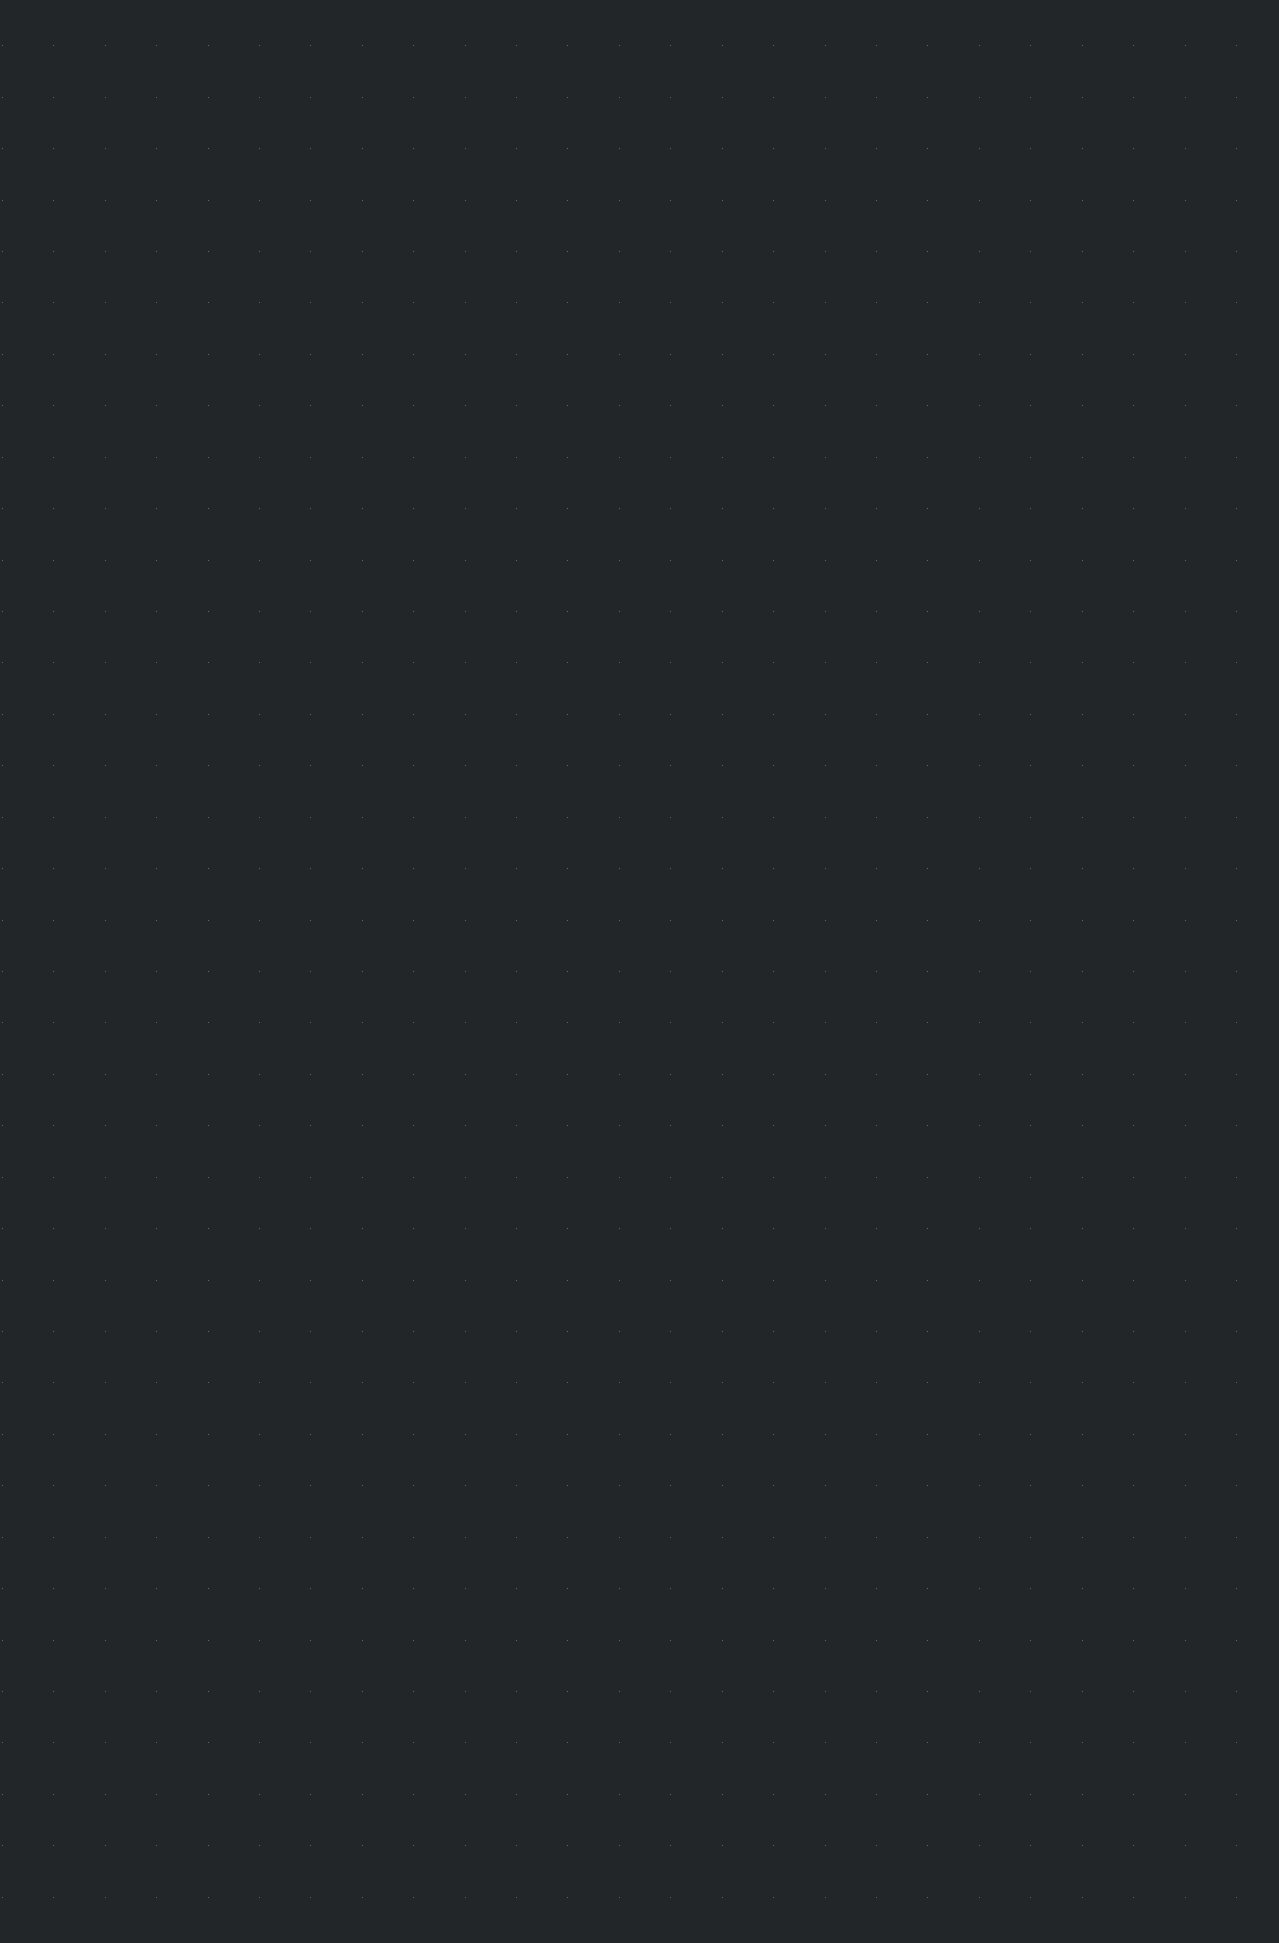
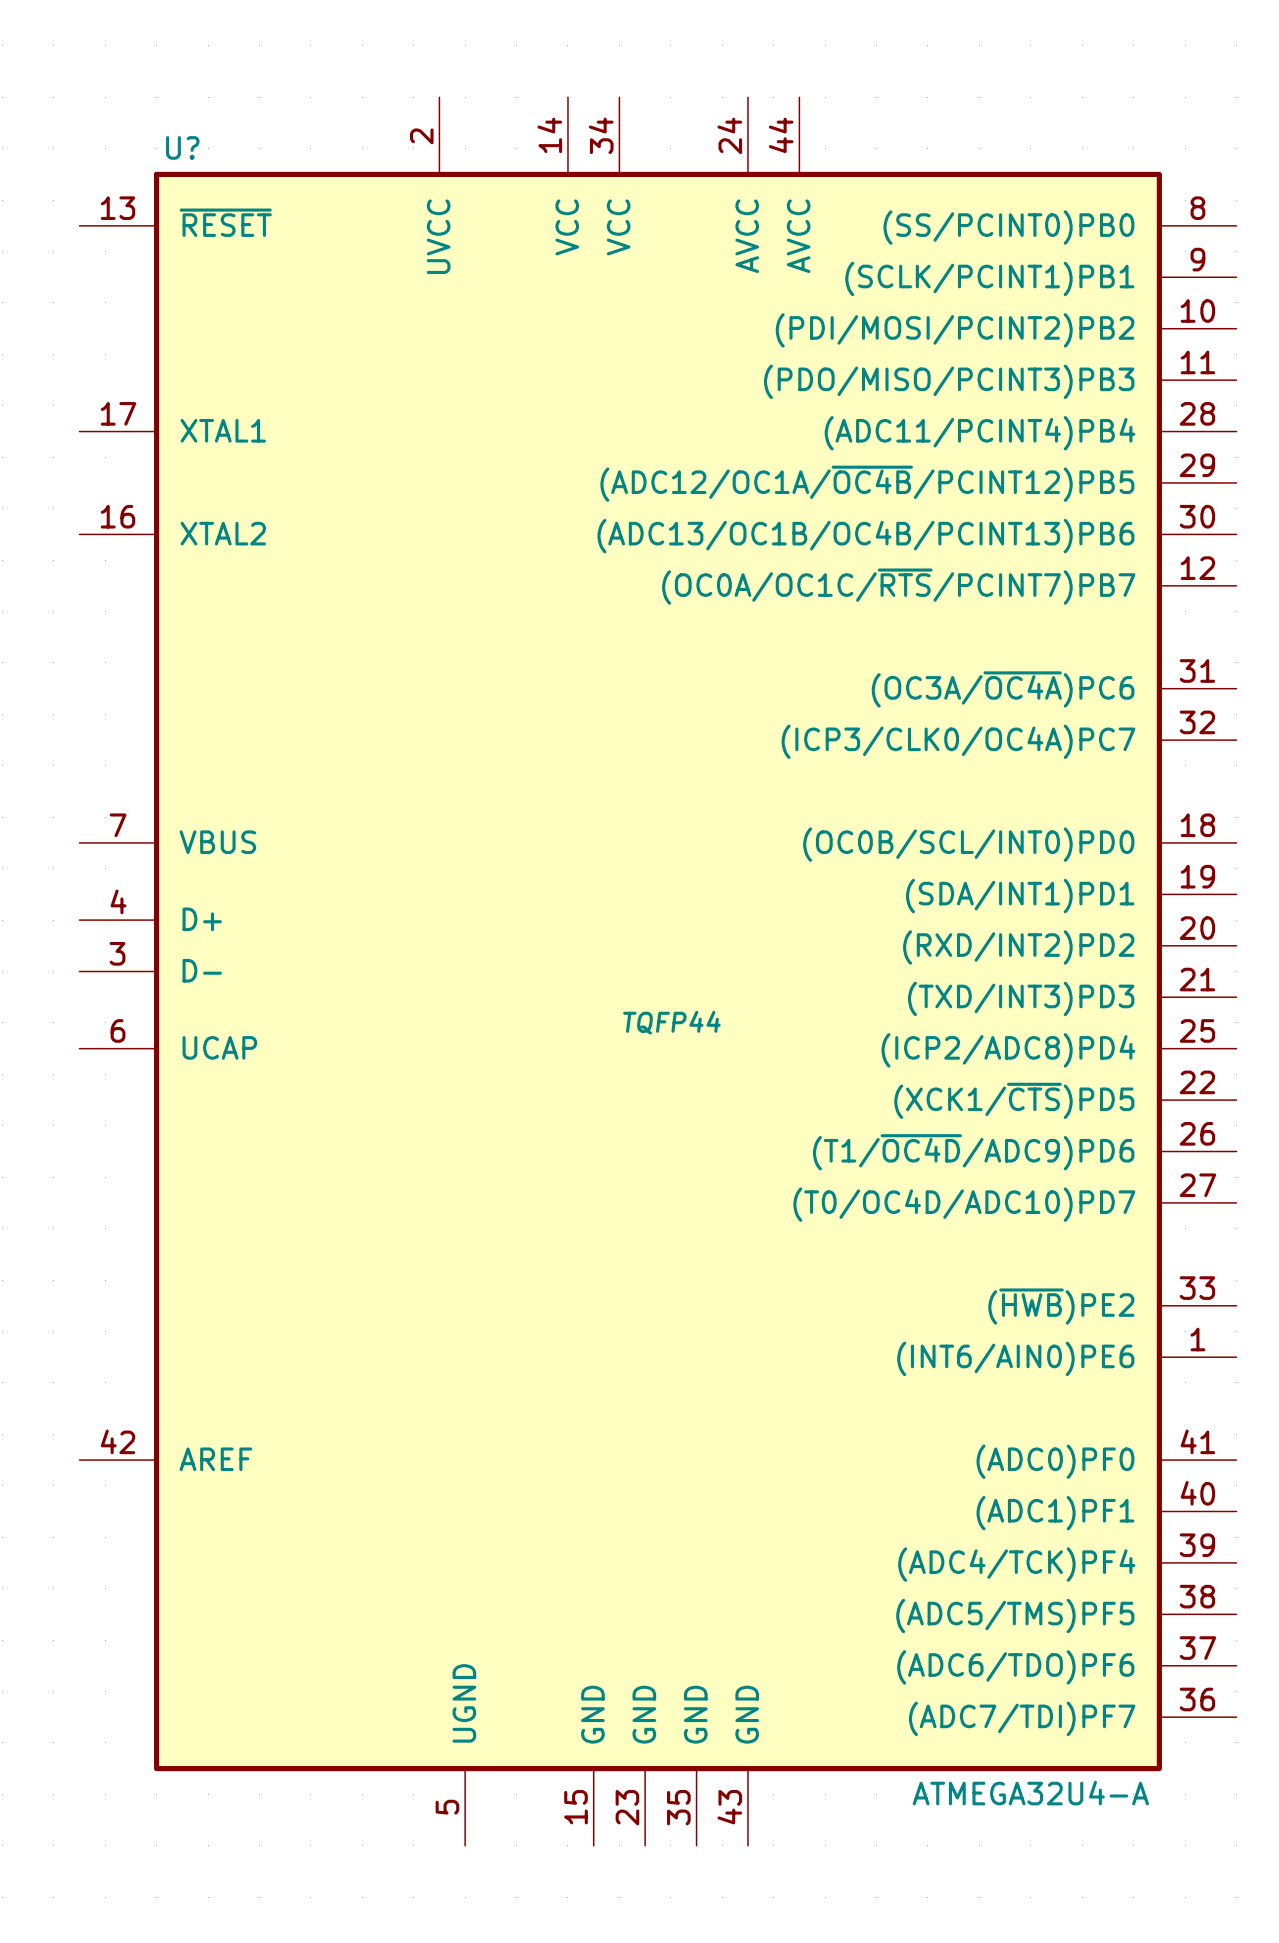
U?: none -> ATMEGA32U4-A (657, 971)

